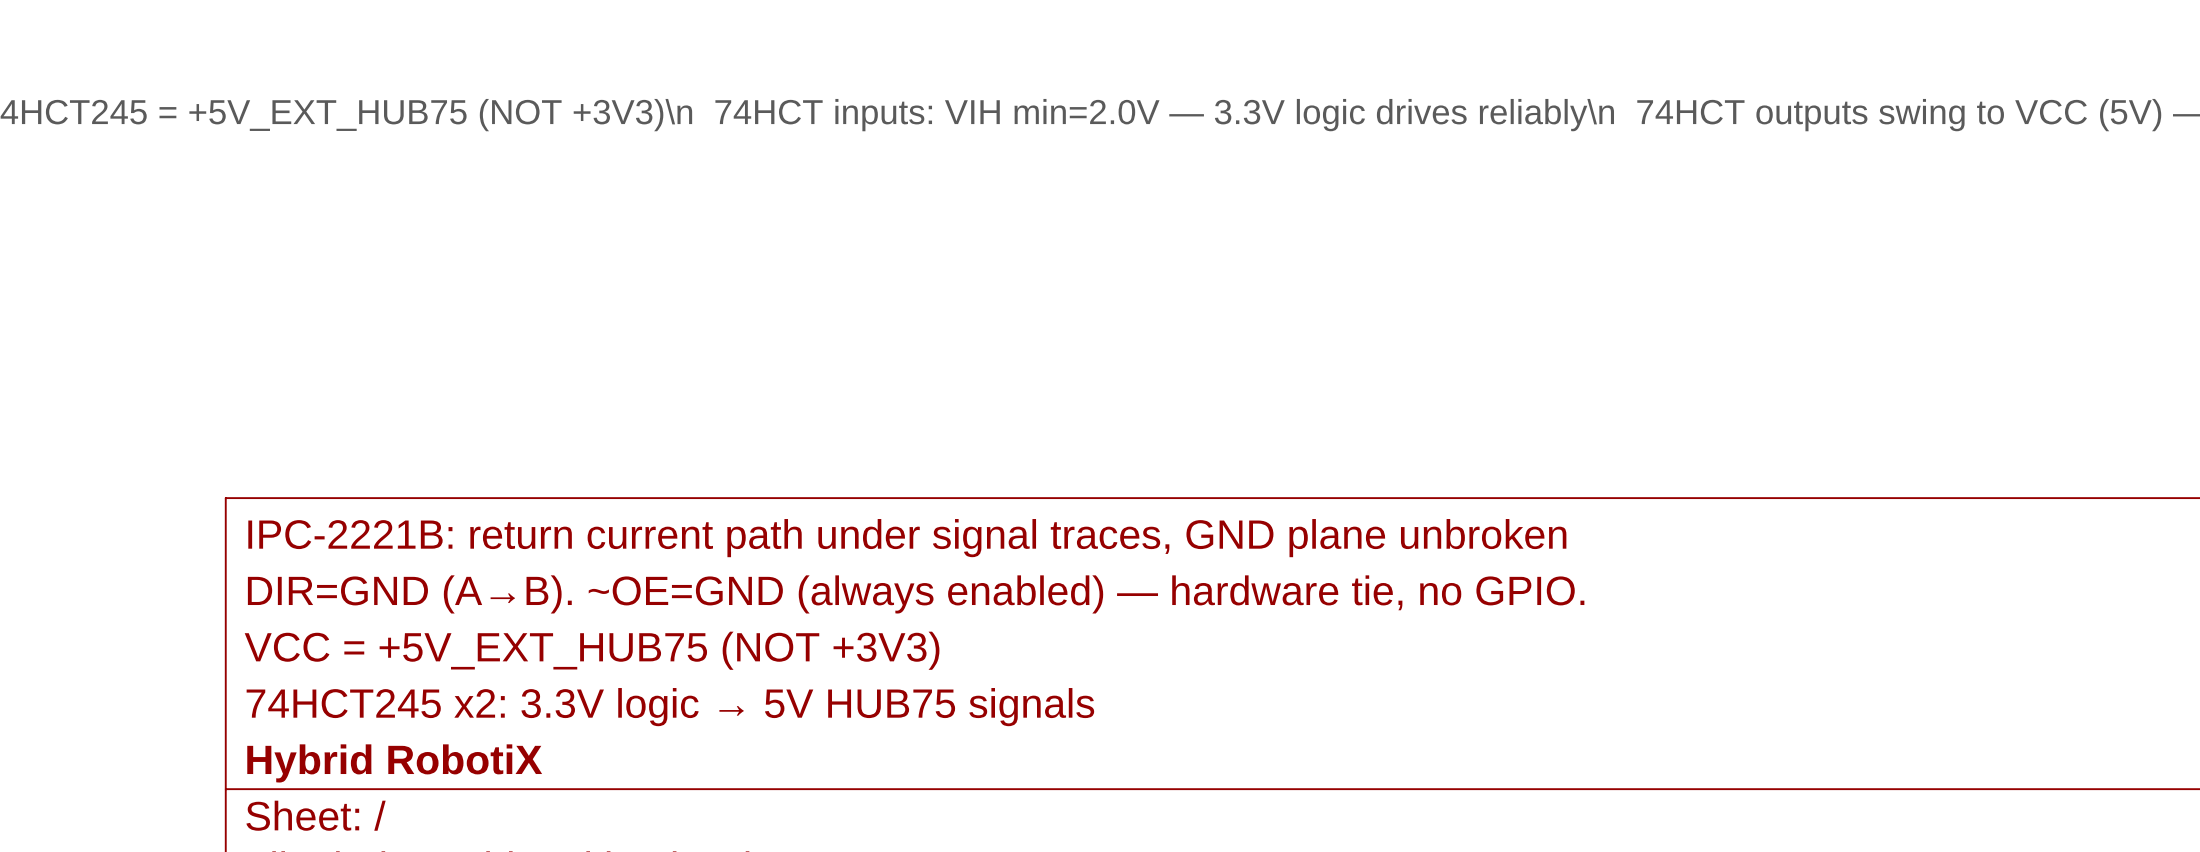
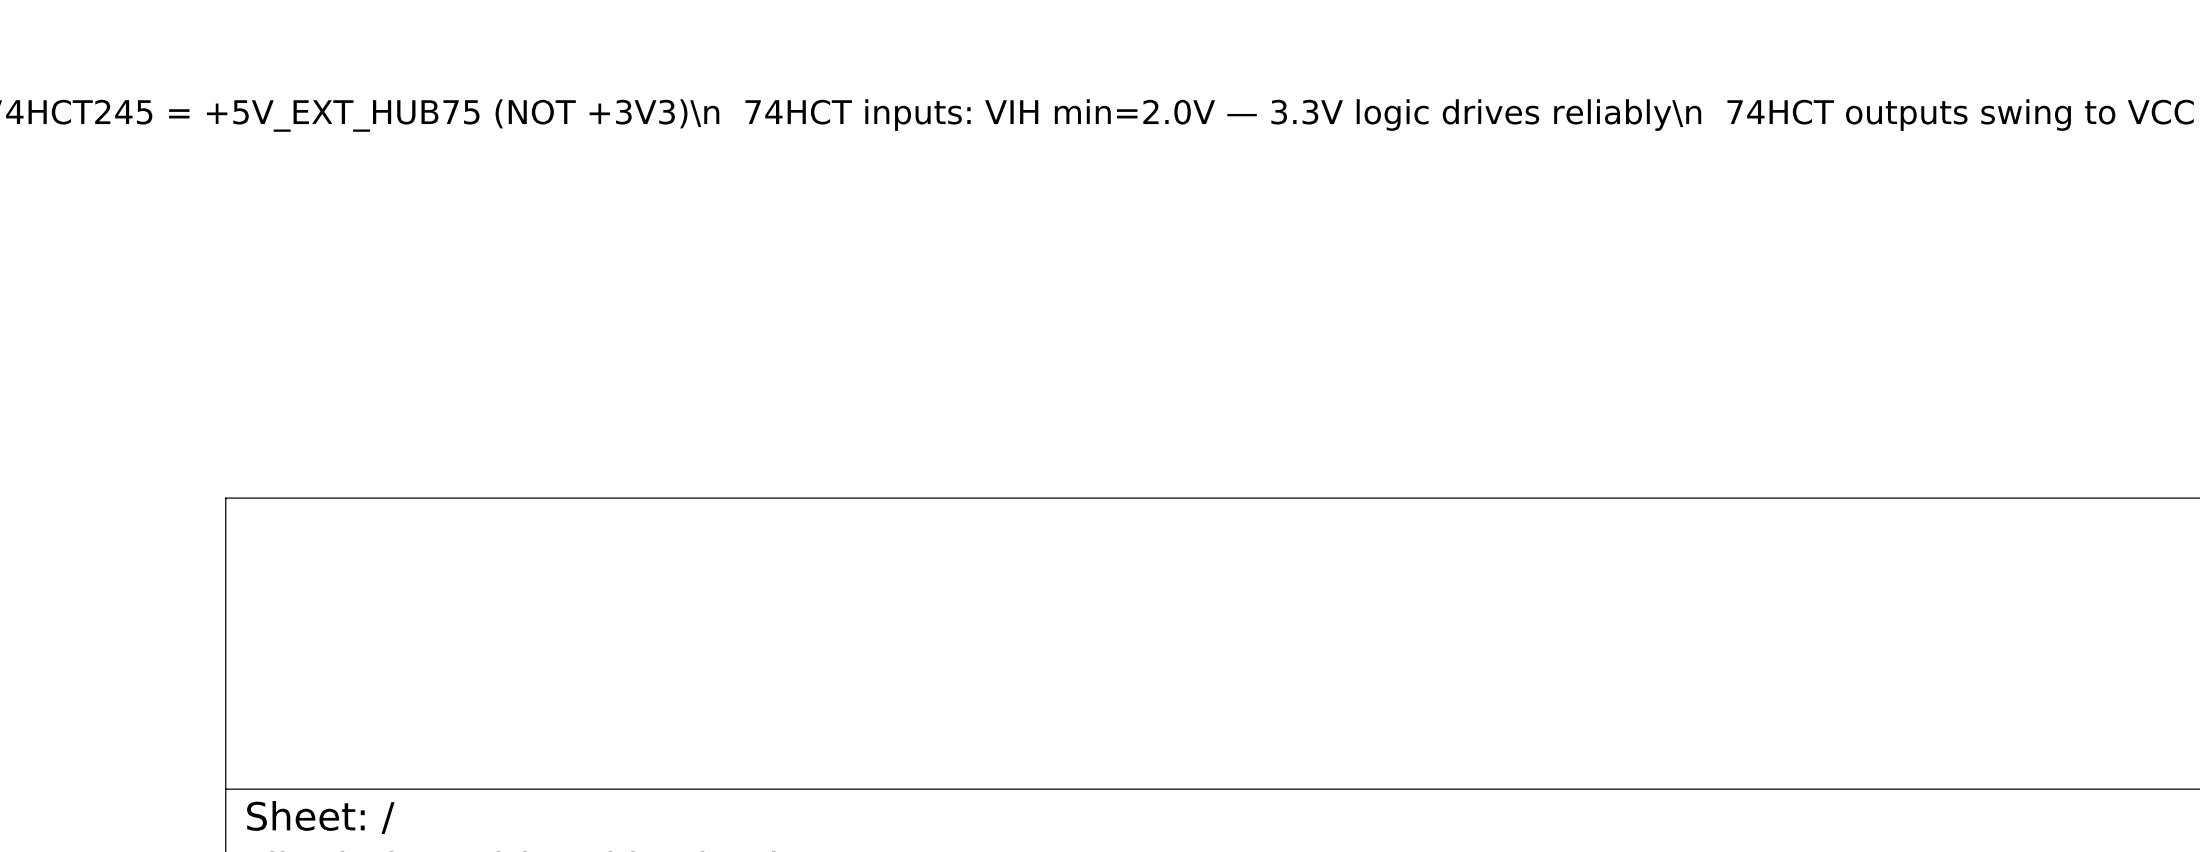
title block: IPC-2221B: return current path under signal traces, GND plane unbroken (907, 538) -> none
title block: DIR=GND (A→B). ~OE=GND (always enabled) — hardware tie, no GPIO. (916, 594) -> none
title block: VCC = +5V_EXT_HUB75 (NOT +3V3) (592, 650) -> none
title block: 74HCT245 x2: 3.3V logic → 5V HUB75 signals (670, 707) -> none
title block: Hybrid RobotiX (394, 763) -> none

